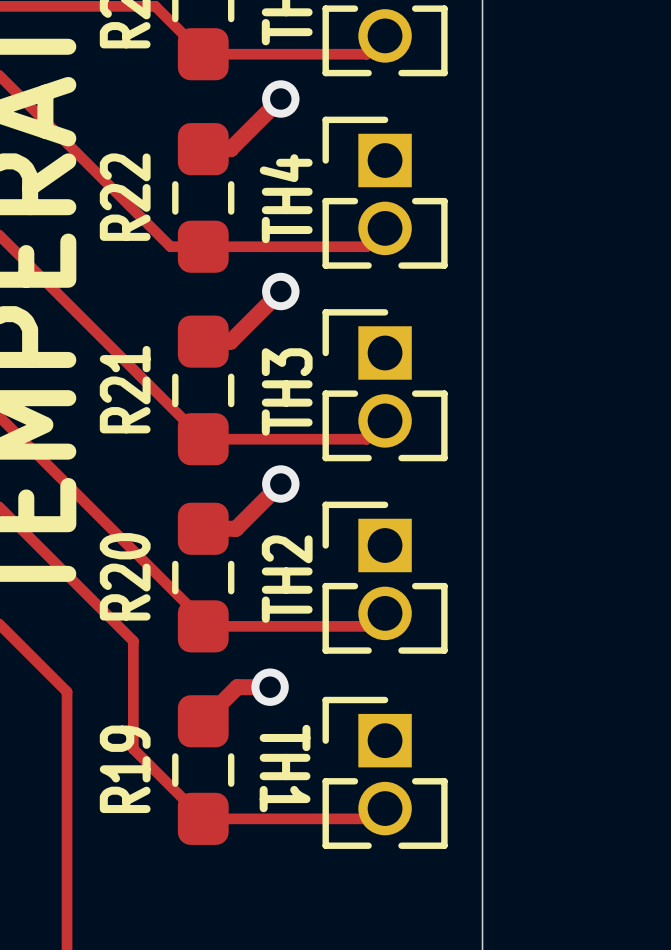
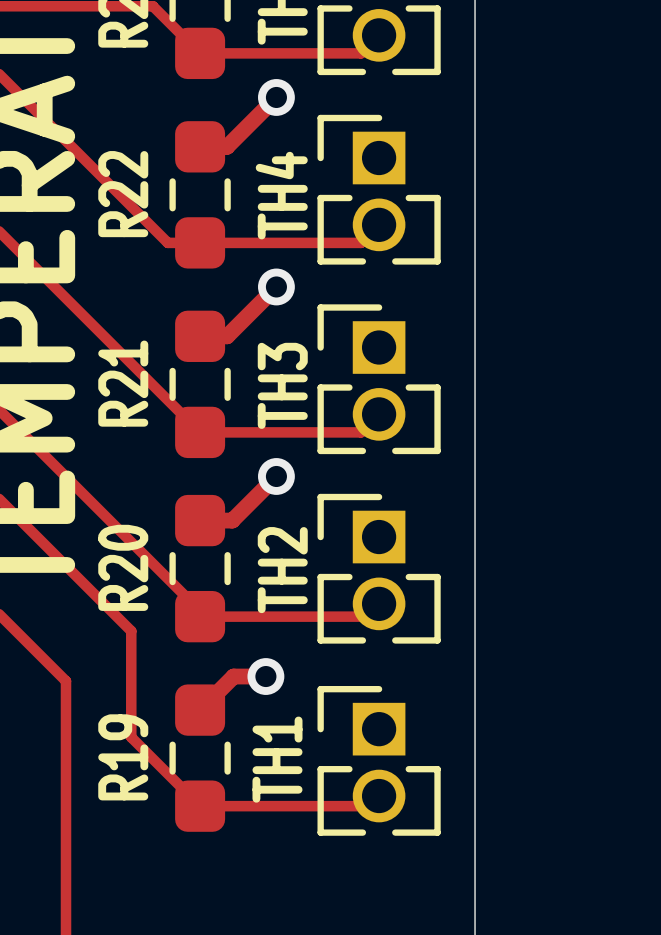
TH1 name rotation: 0° (285, 768) -> 180° (277, 759)

